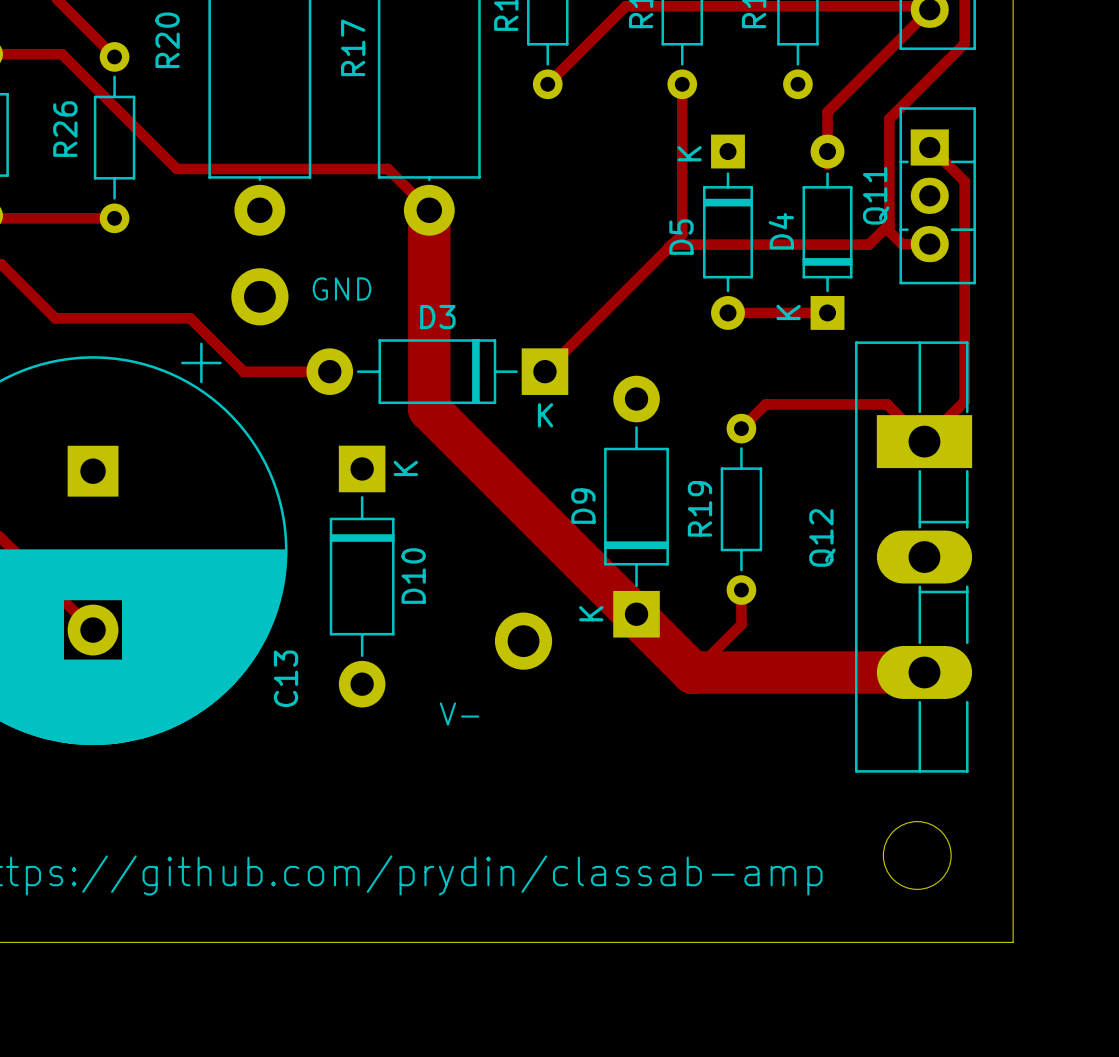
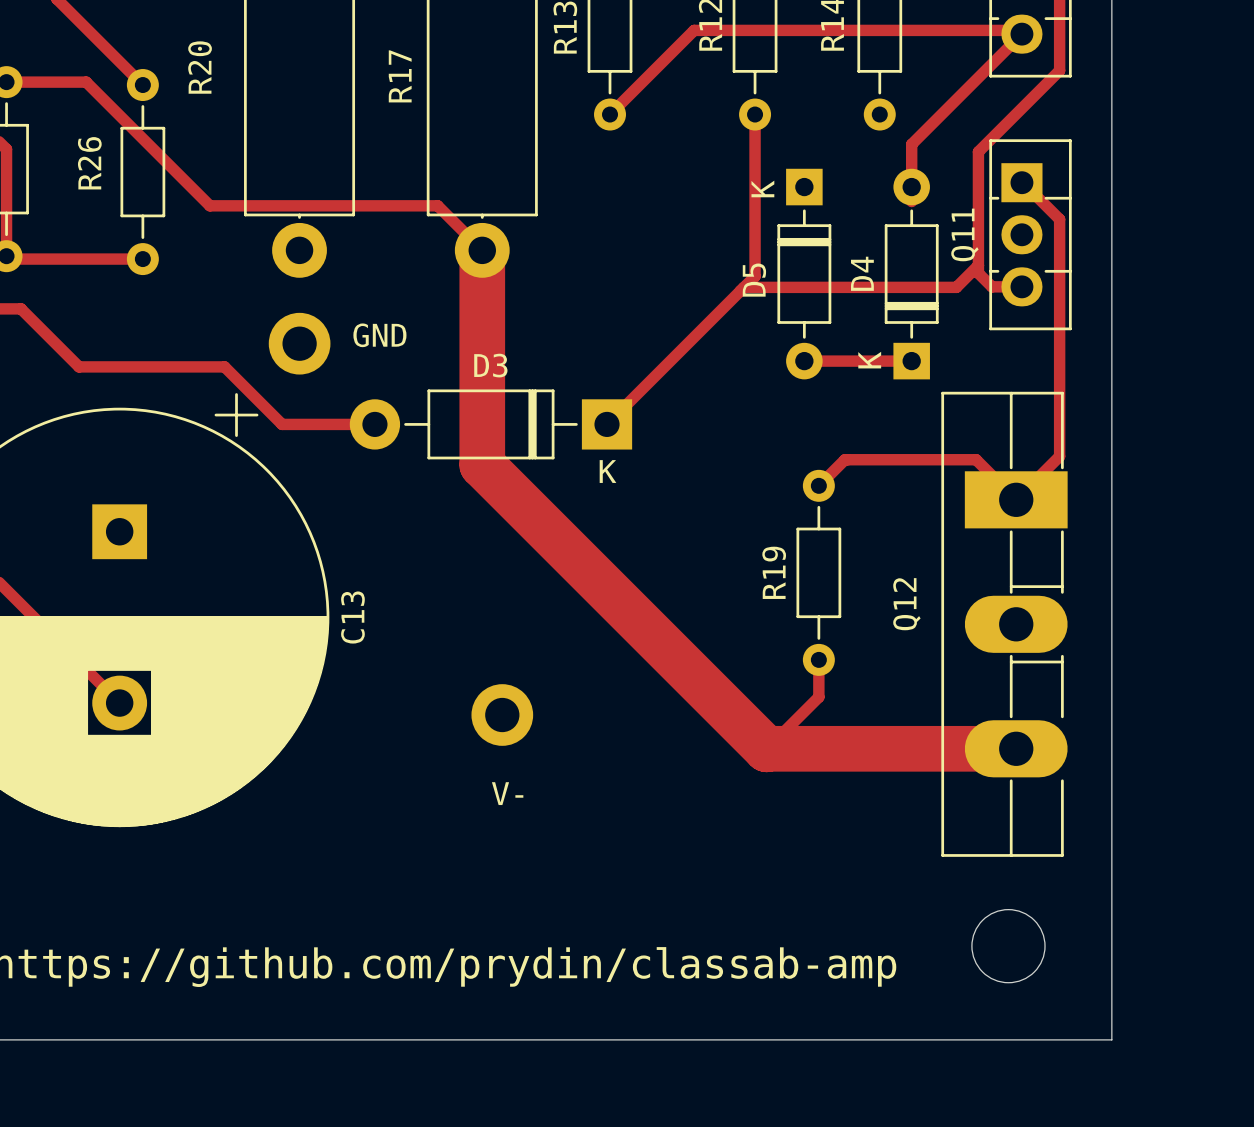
D9: (636, 506) -> none
D10: (362, 576) -> none
part position: (523, 641) -> (502, 715)
C13 name position: C13 (286, 678) -> C13 (352, 617)

